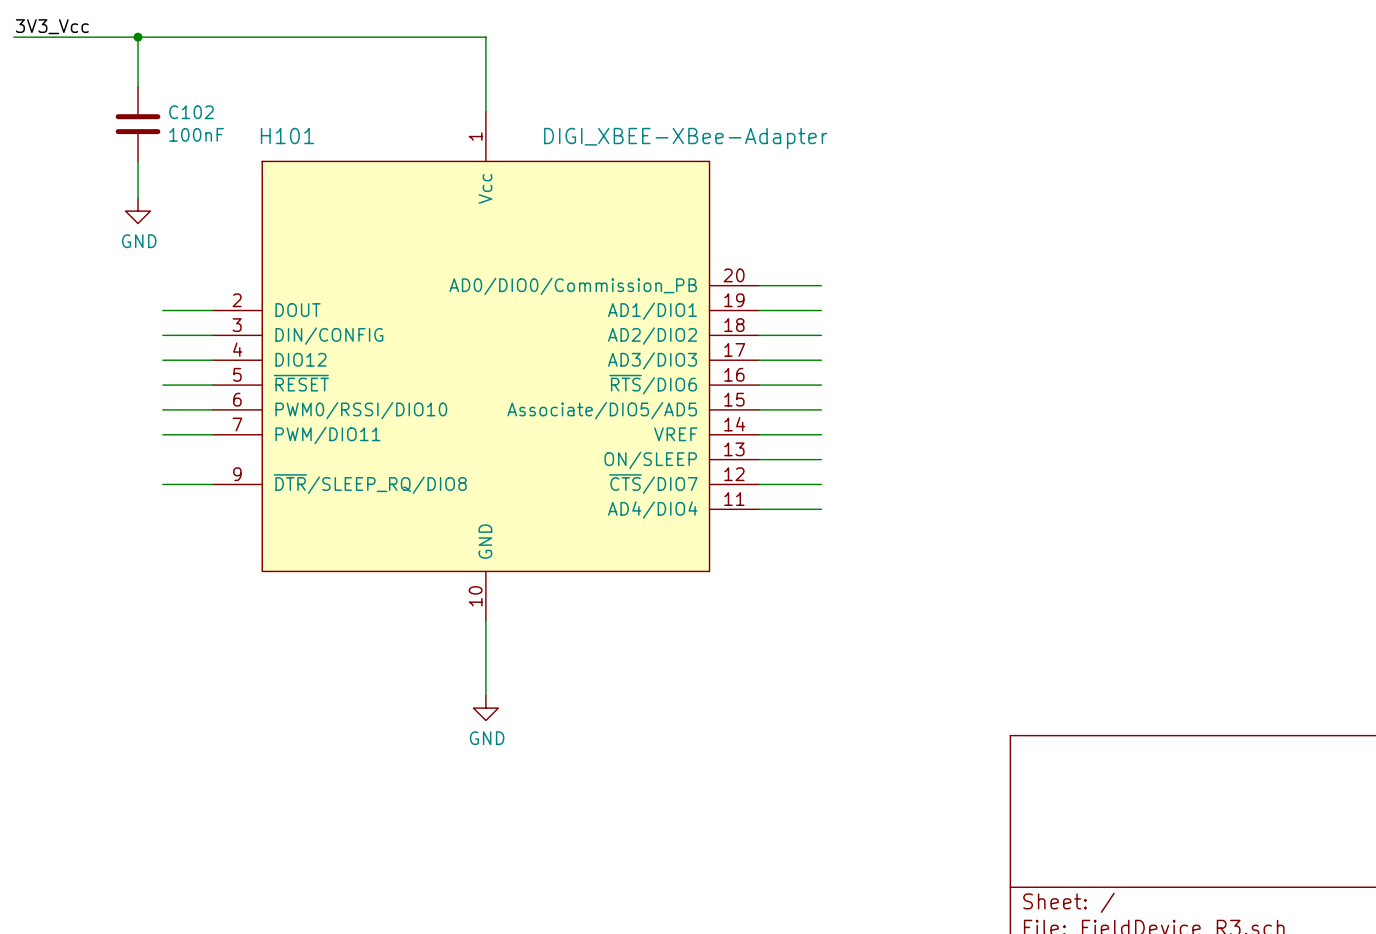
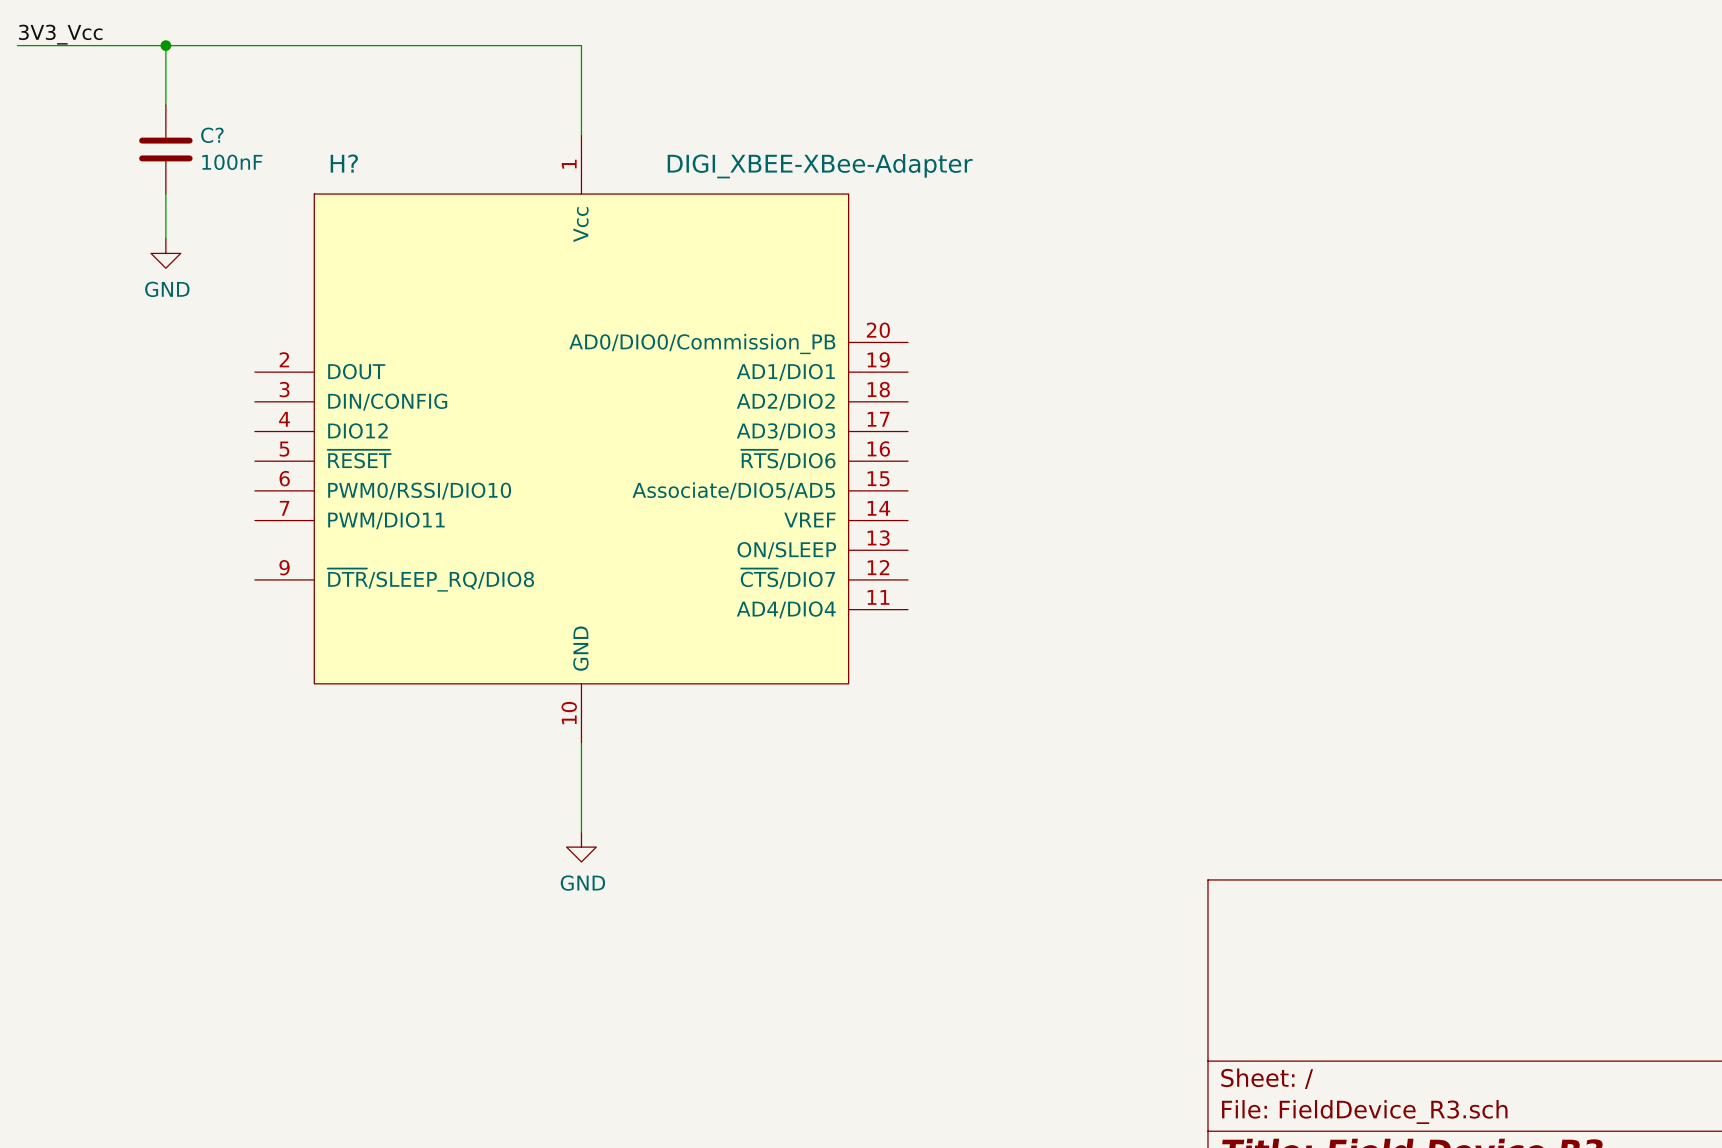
C102 name: C102 (191, 112) -> C? (212, 135)
H101 name: H101 (287, 136) -> H? (344, 163)
wire: (759, 285) (821, 285) -> none
wire: (162, 310) (212, 310) -> none
wire: (759, 310) (821, 310) -> none
wire: (162, 335) (212, 335) -> none
wire: (759, 335) (821, 335) -> none
wire: (162, 360) (212, 360) -> none
wire: (759, 360) (821, 360) -> none
wire: (162, 385) (212, 385) -> none
wire: (759, 385) (821, 385) -> none
wire: (162, 409) (212, 409) -> none
wire: (759, 409) (821, 409) -> none
wire: (162, 434) (212, 434) -> none
wire: (759, 434) (821, 434) -> none
wire: (759, 459) (821, 459) -> none
wire: (162, 484) (212, 484) -> none
wire: (759, 484) (821, 484) -> none
wire: (759, 509) (821, 509) -> none

